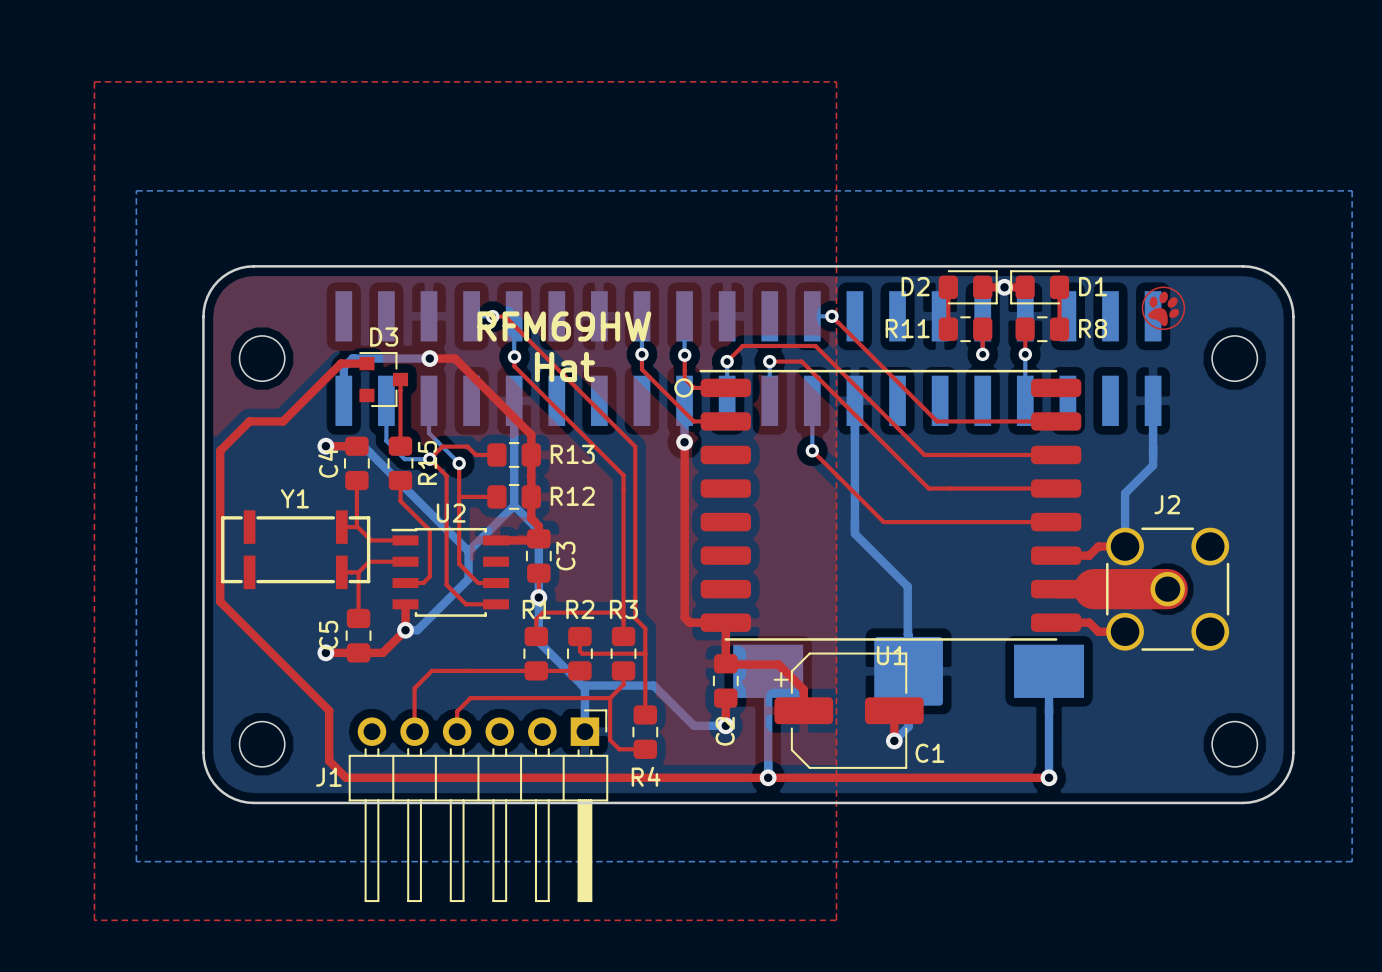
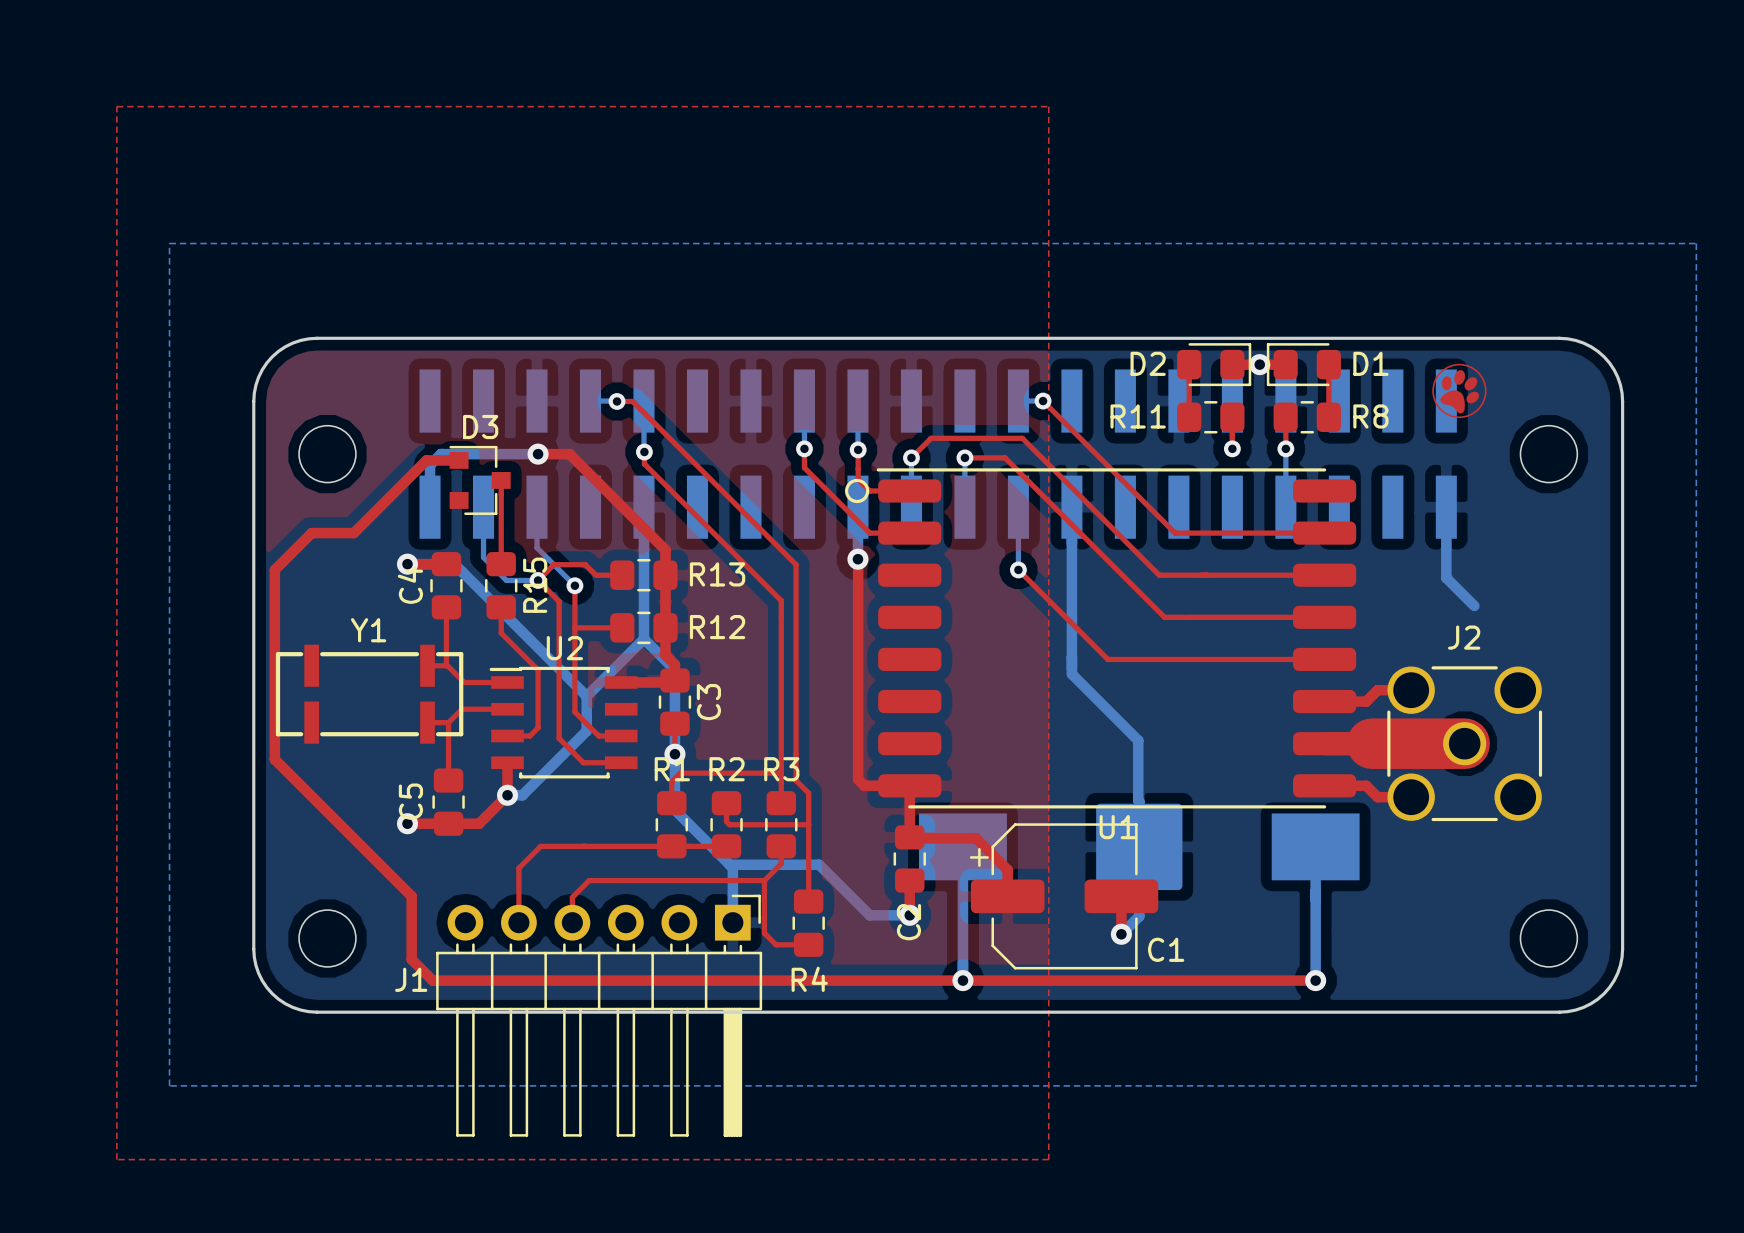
text: RFM69HW (564, 326) -> none
text: Hat (564, 366) -> none
bottom track: (1153, 457) (1153, 465) (1125, 493) (1125, 546) -> (1446, 577) (1474, 605)

